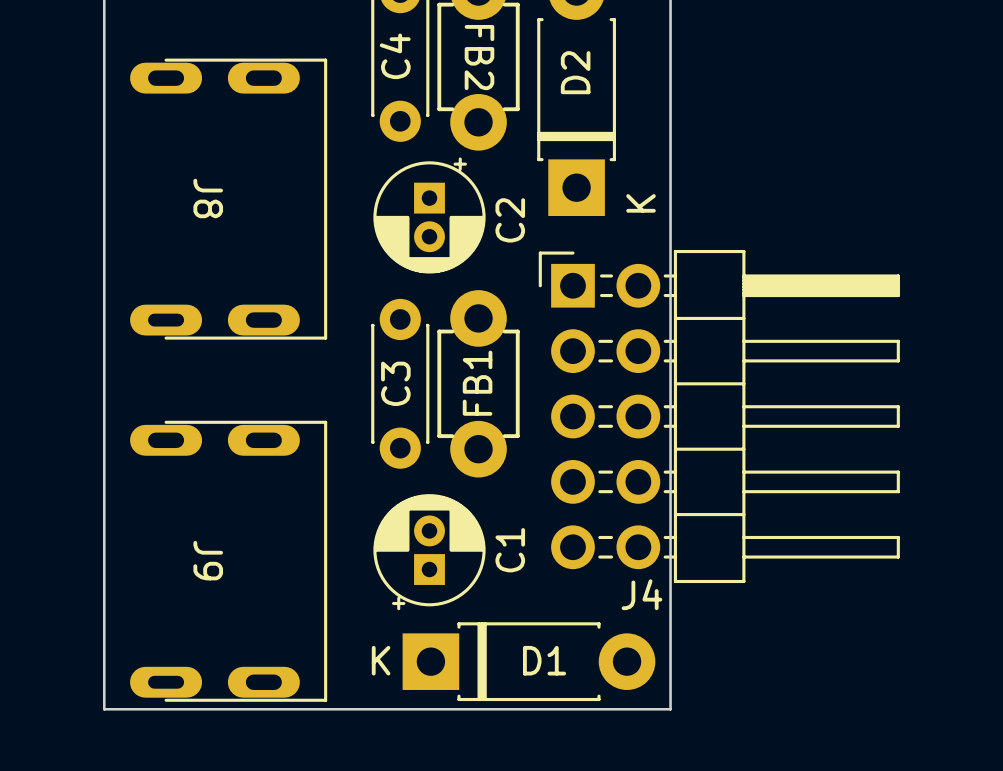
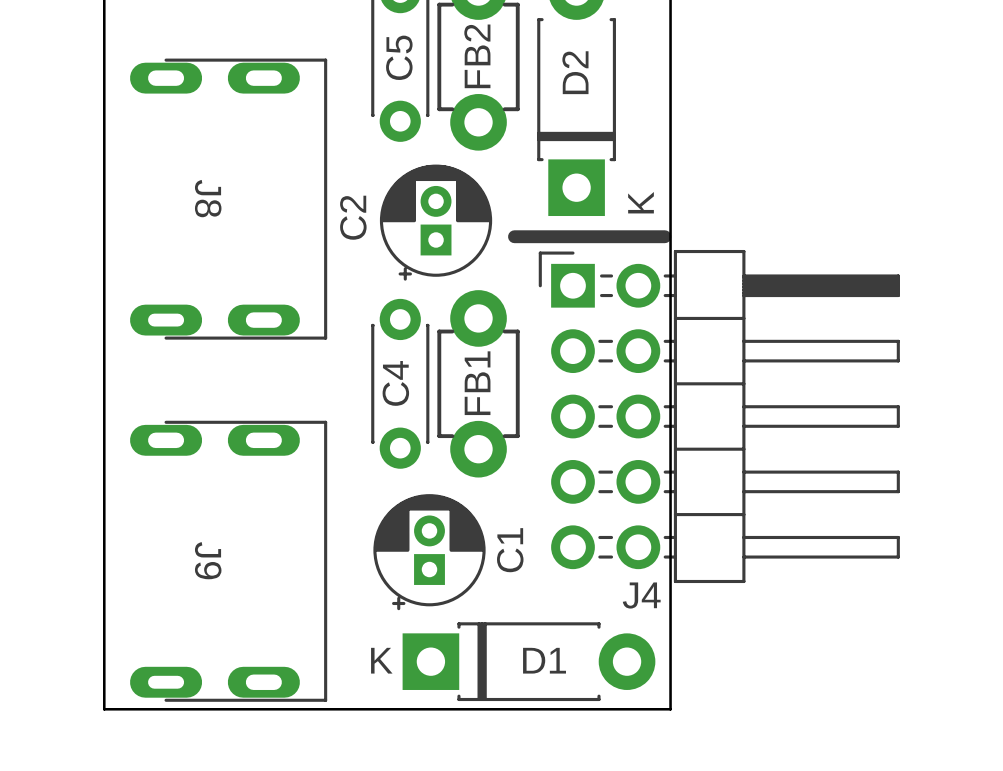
C4 name: C4 (395, 56) -> C5 (399, 57)
FB2 name rotation: 0° (479, 57) -> 180° (477, 56)
C2 rotation: 0° (429, 215) -> 180° (436, 222)
line: none -> (514, 236) (664, 236)
C3 name: C3 (395, 383) -> C4 (395, 383)

